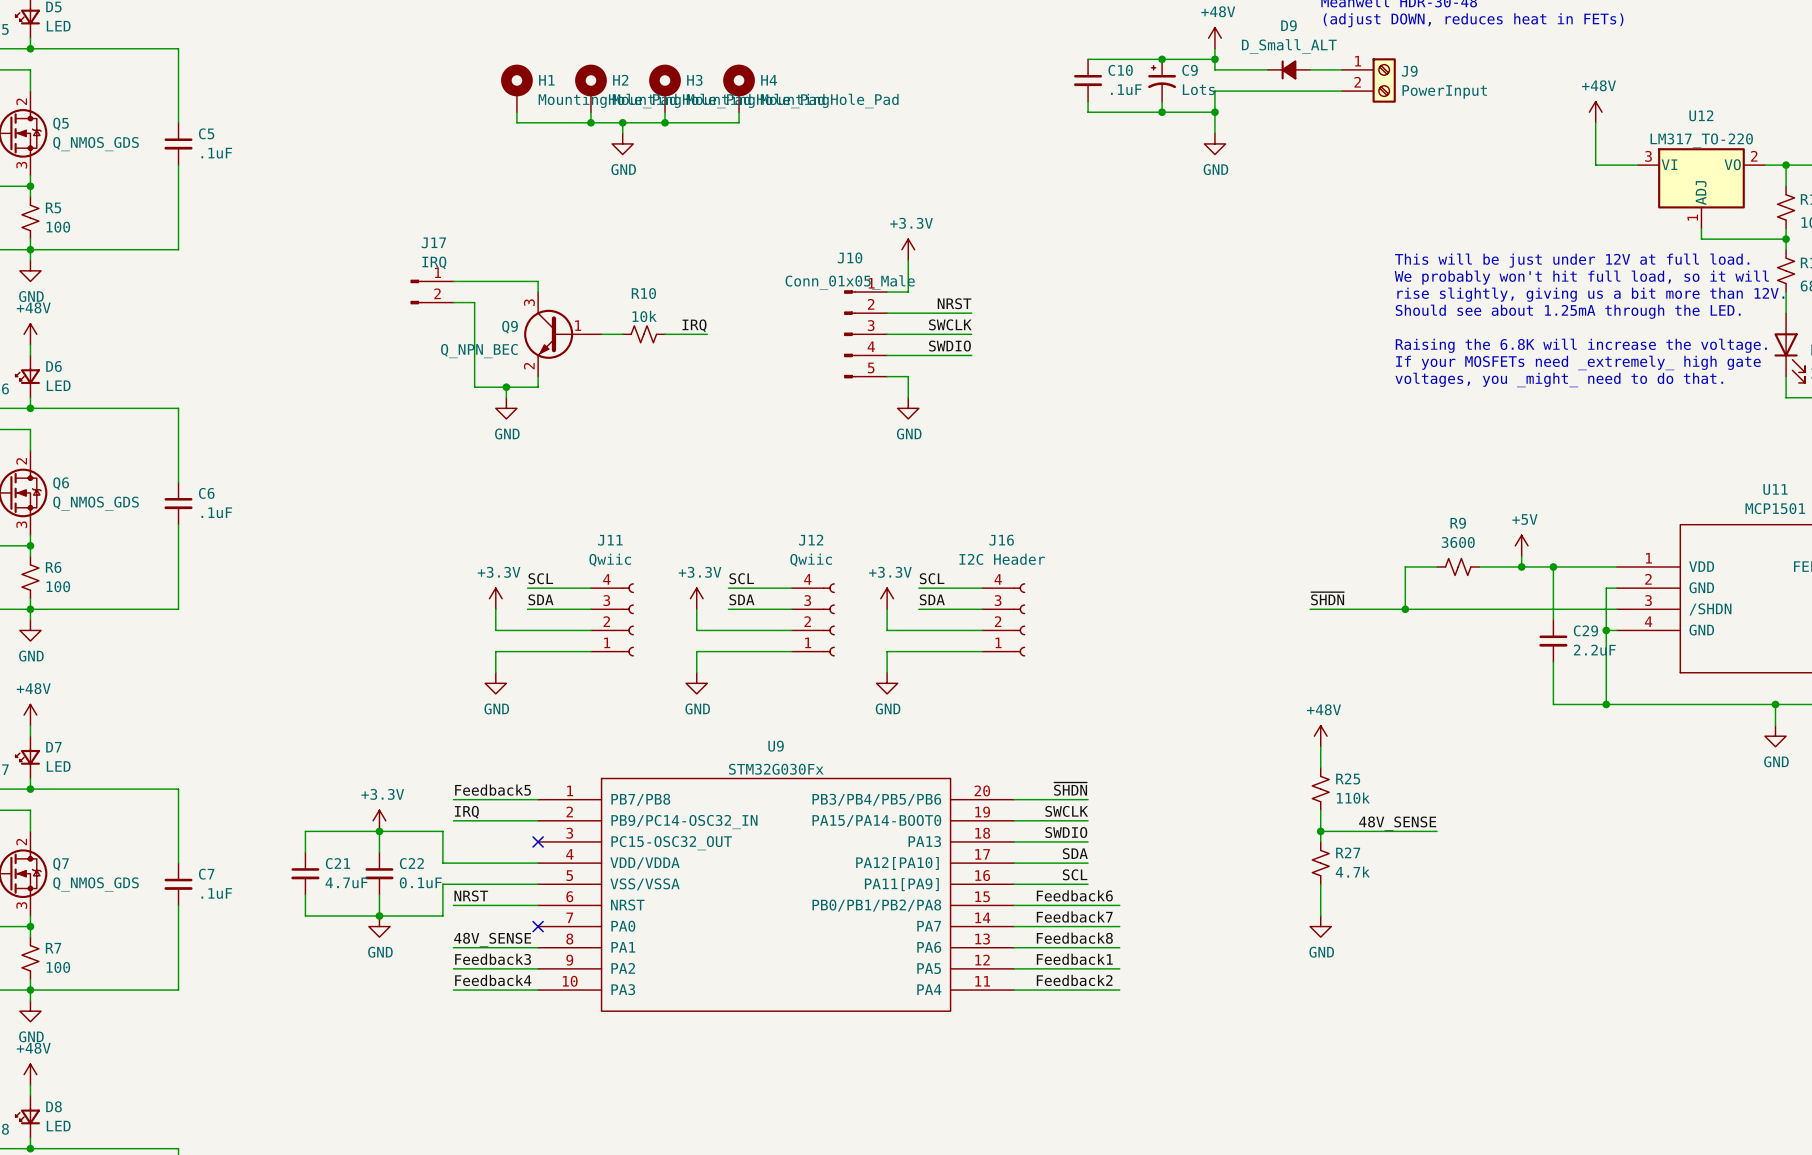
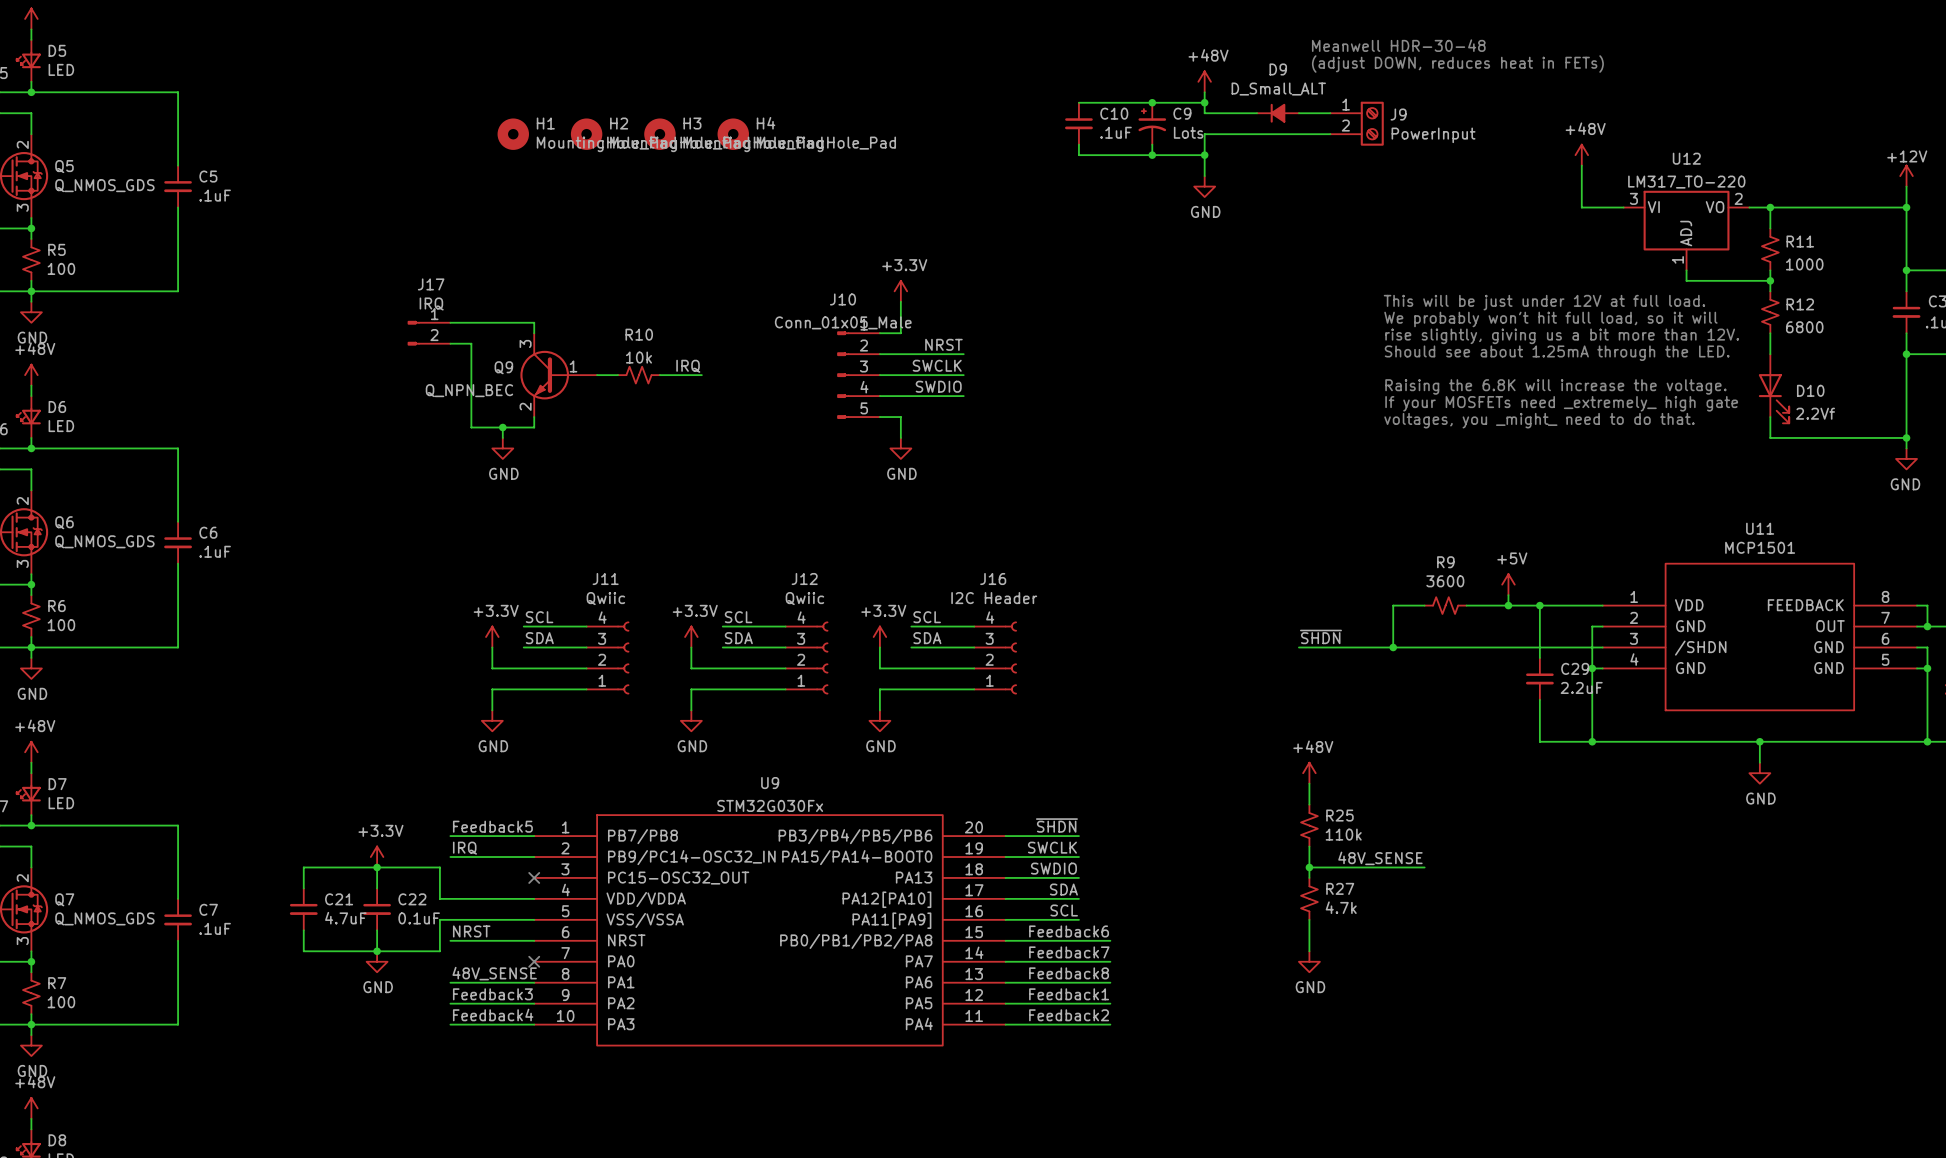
H1 symbol: [501, 64, 533, 113] -> [497, 118, 529, 150]
H2 symbol: [575, 64, 607, 113] -> [570, 118, 603, 150]
H3 symbol: [649, 64, 681, 113] -> [644, 118, 676, 150]
H4 symbol: [723, 64, 755, 113] -> [717, 118, 749, 150]
wire: (516, 112) (516, 122) (739, 122) (739, 112) -> none
wire: (590, 112) (590, 122) -> none
wire: (665, 112) (665, 122) -> none
junction: (590, 122) -> none
wire: (622, 122) (622, 133) -> none
junction: (622, 122) -> none
junction: (665, 122) -> none
power symbol: GND (622, 143) -> none

